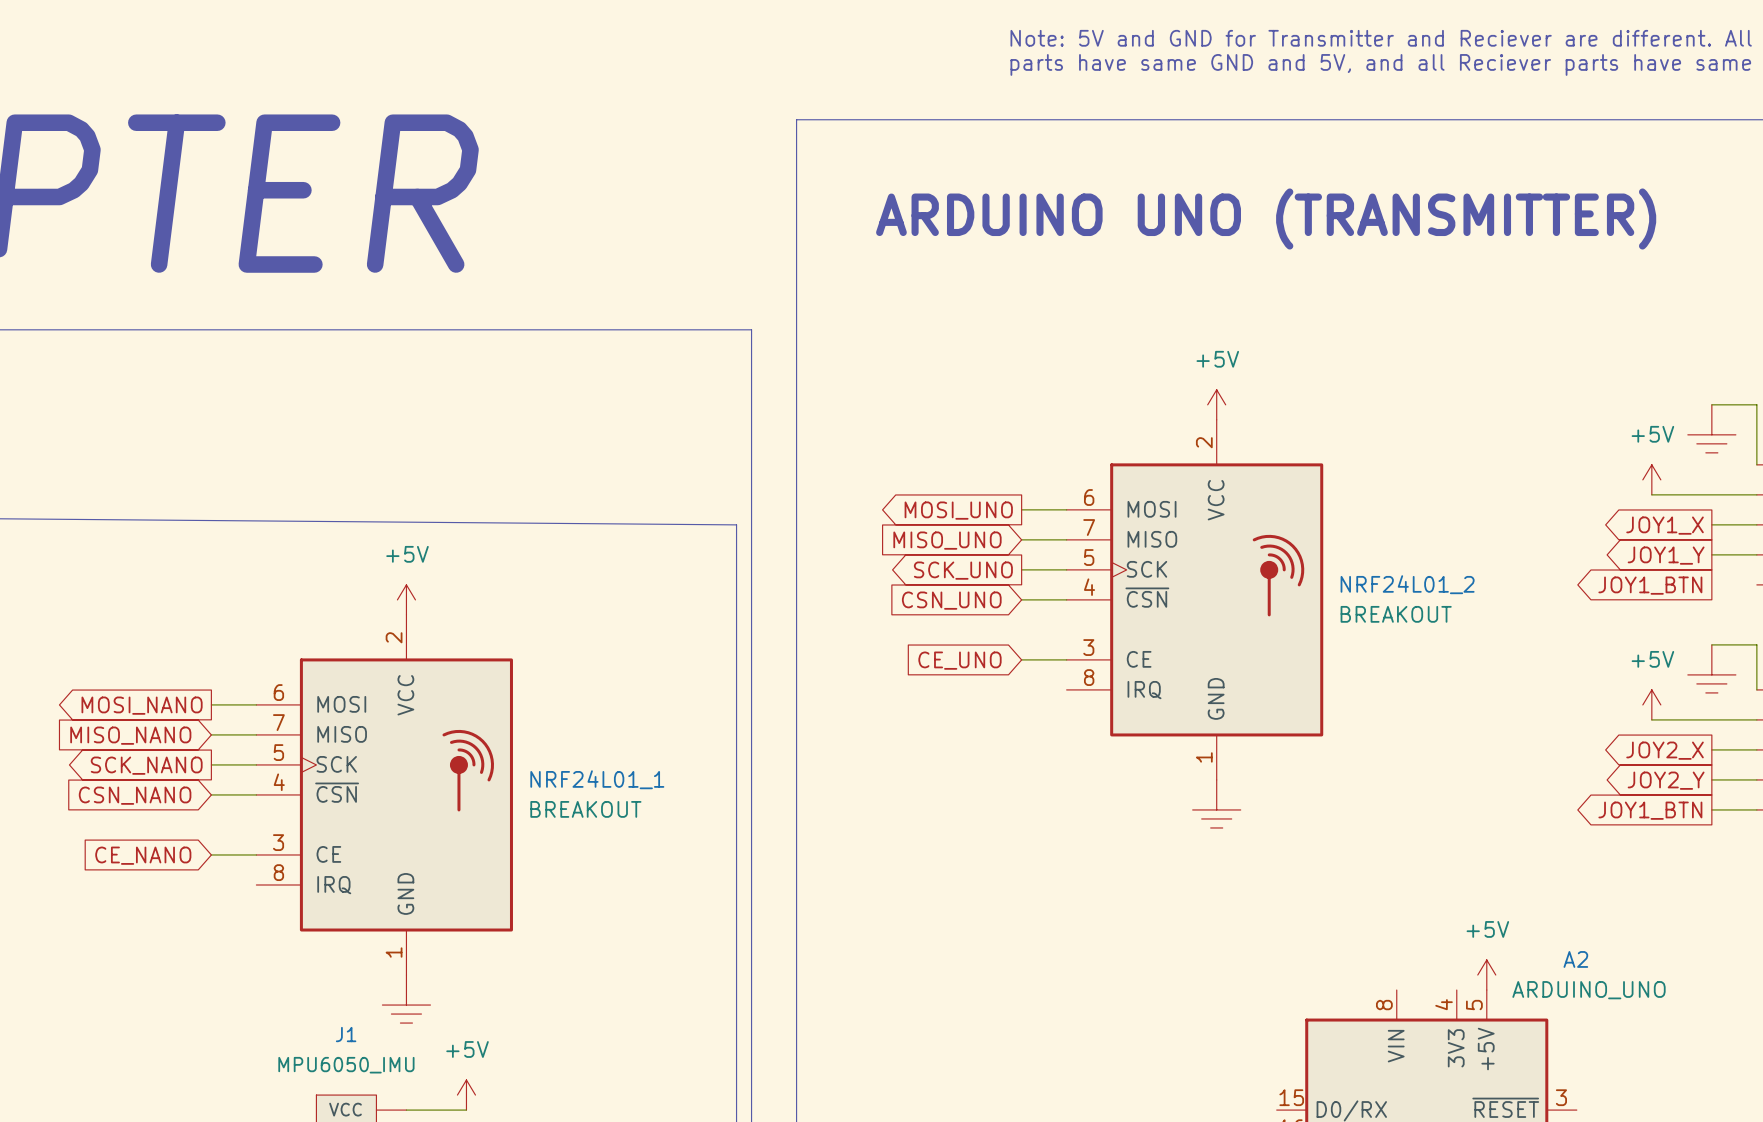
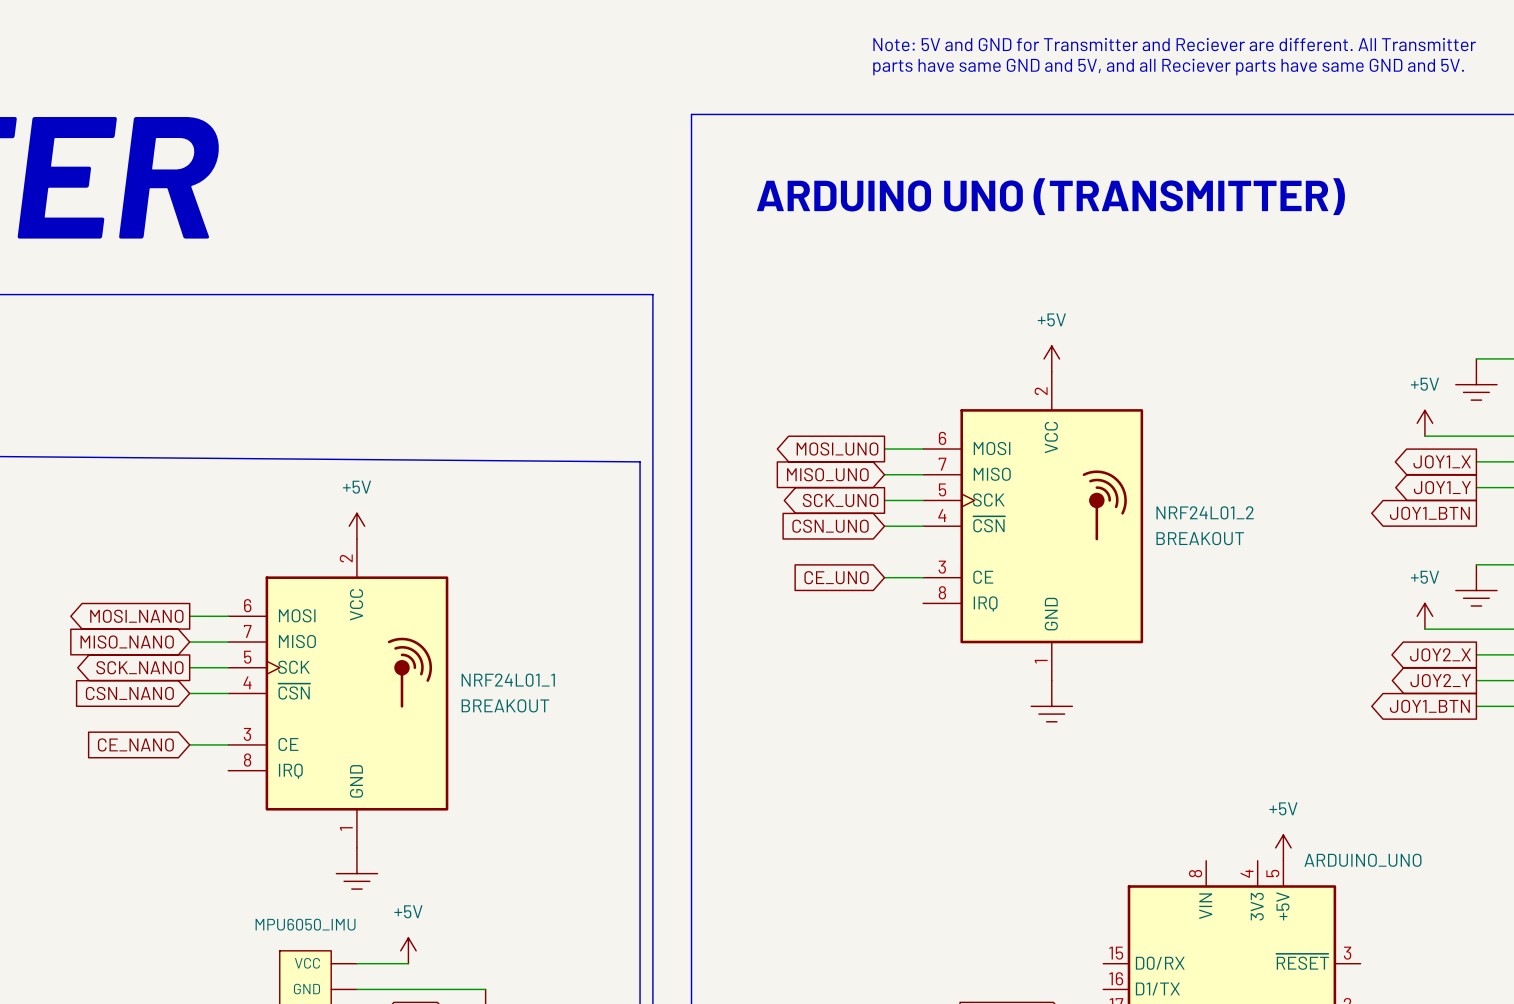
A2 name: A2 (1575, 959) -> none
J1 name: J1 (346, 1034) -> none

